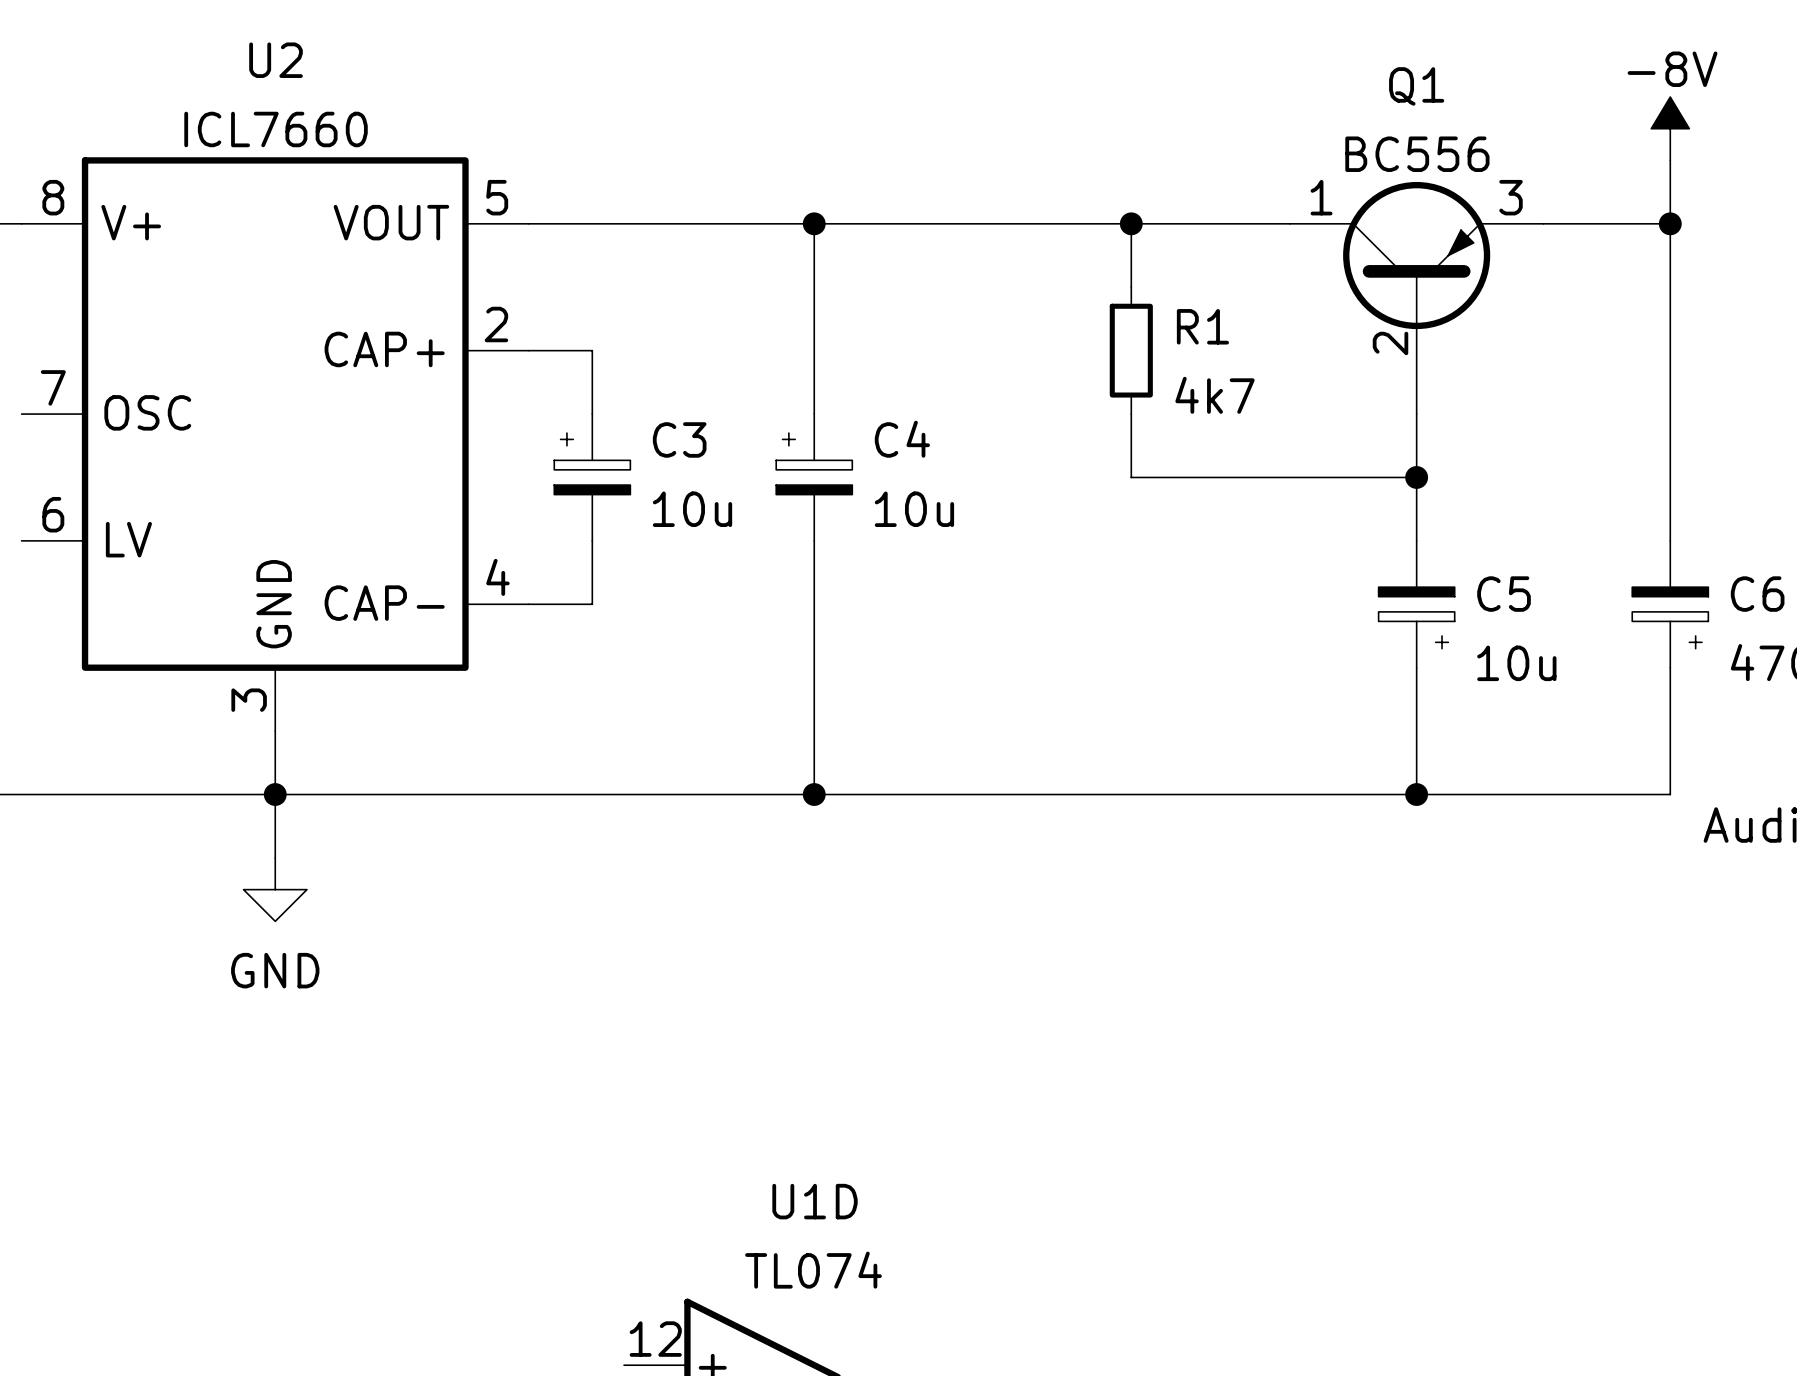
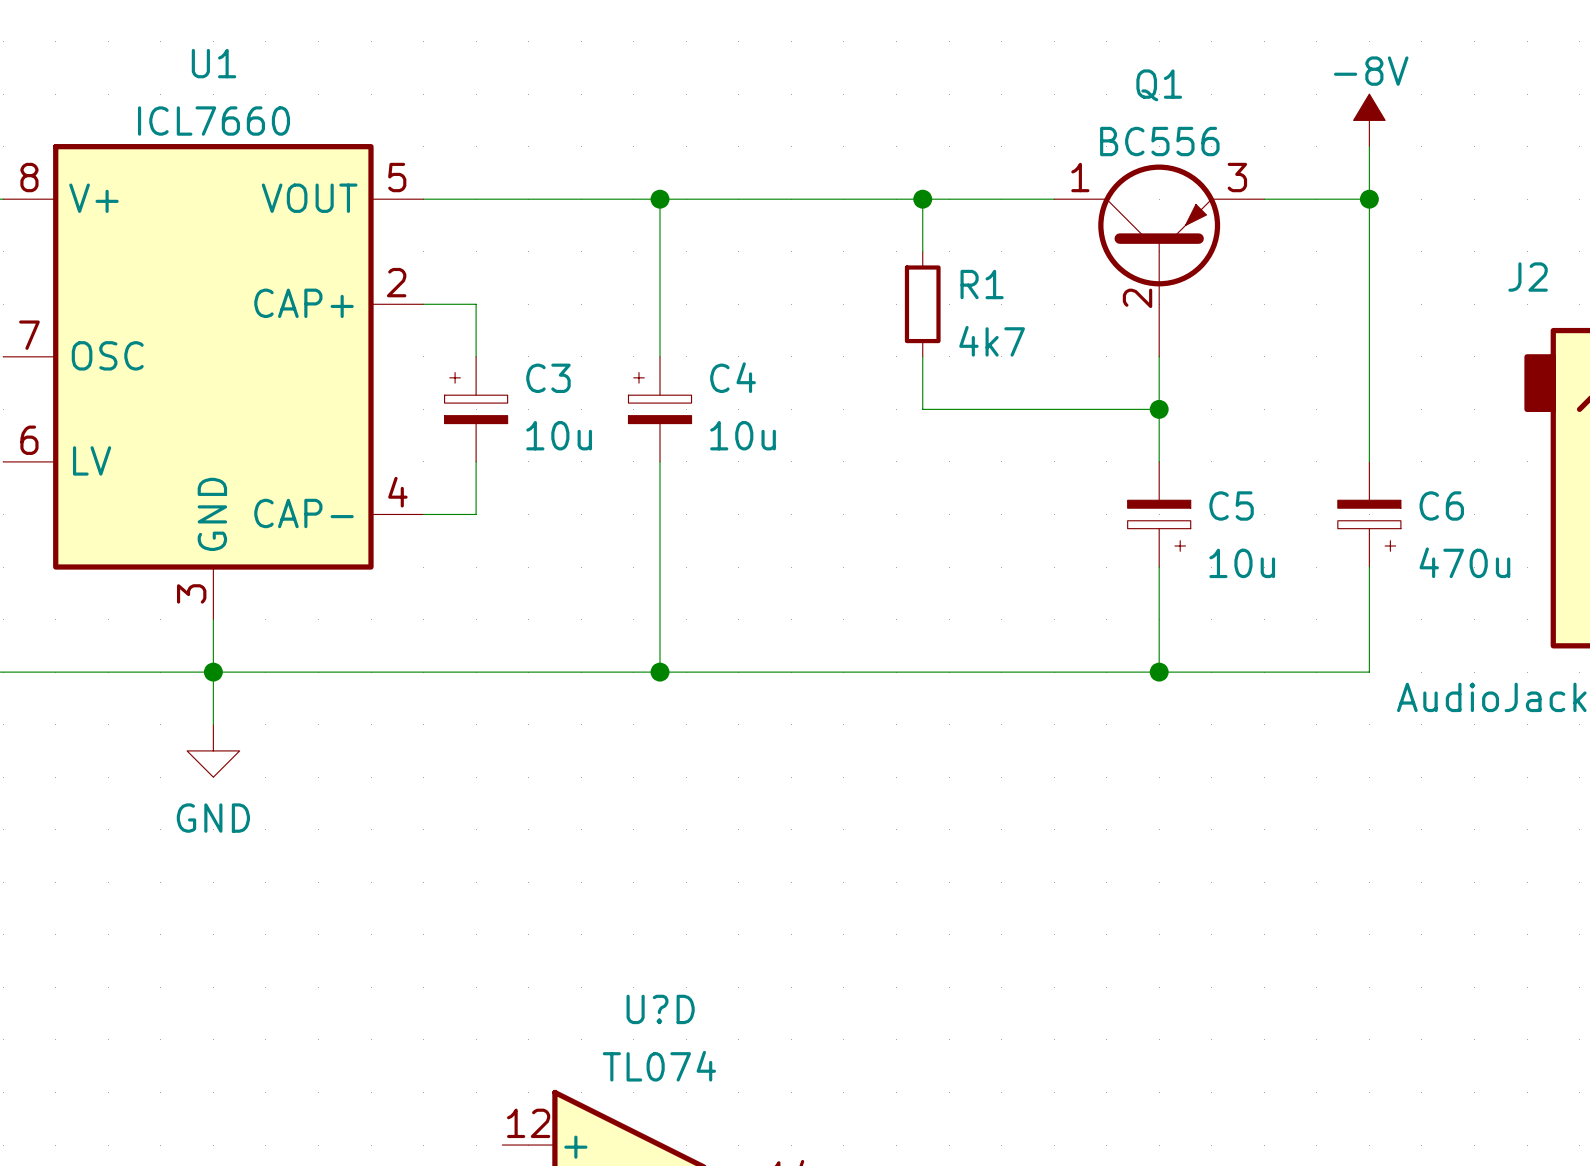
U2 name: U2 (276, 60) -> U1 (213, 63)
U1D name: U1D (815, 1201) -> U?D (660, 1009)

